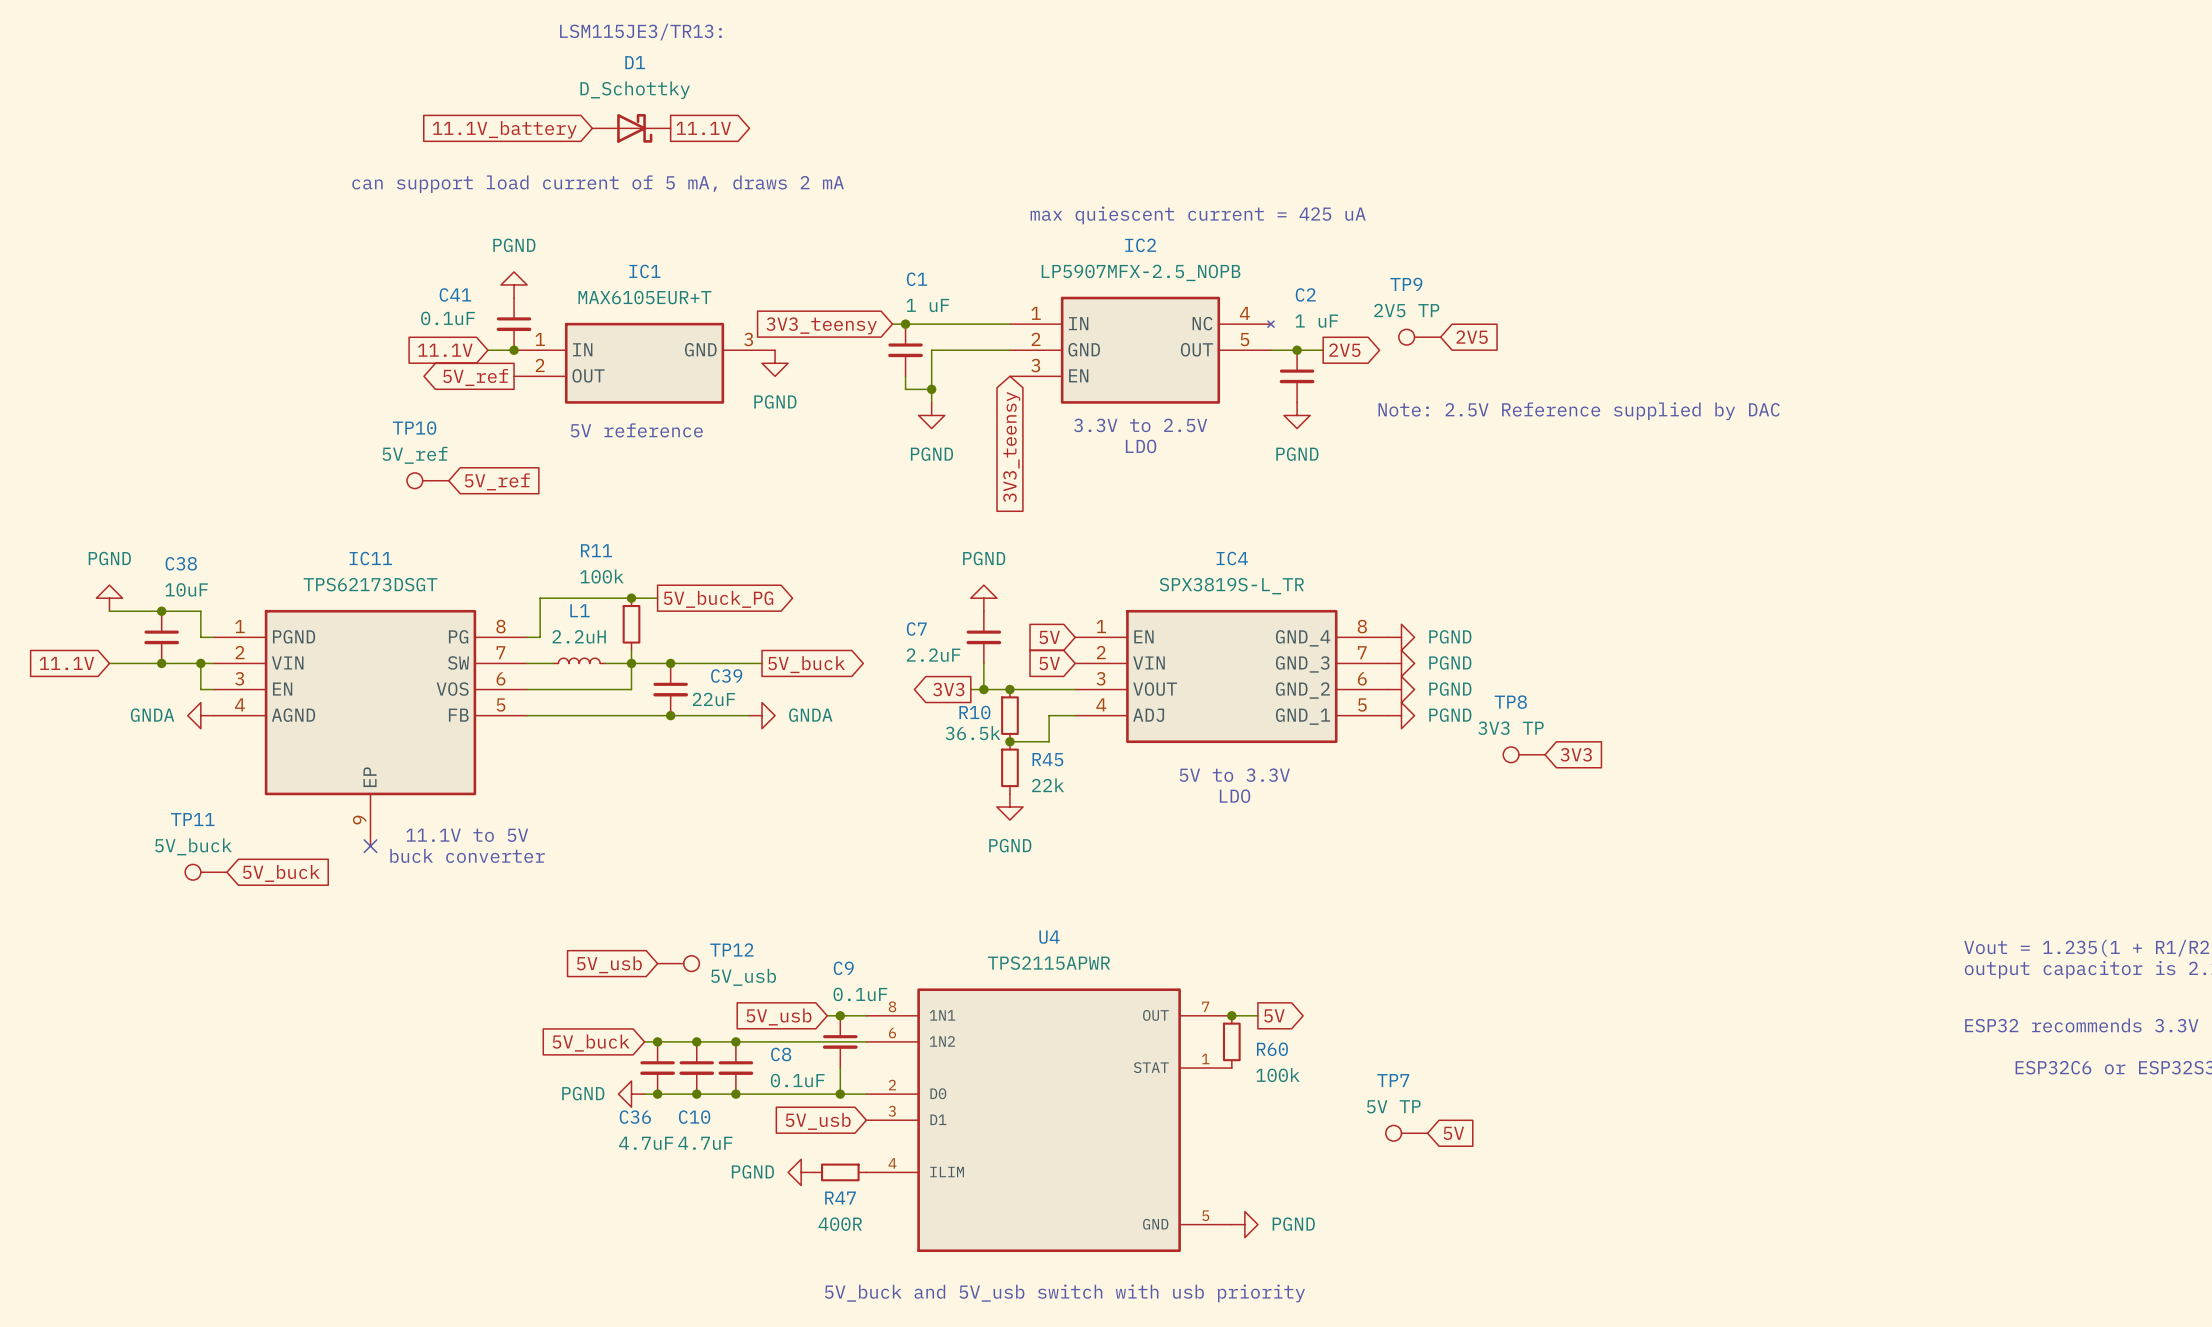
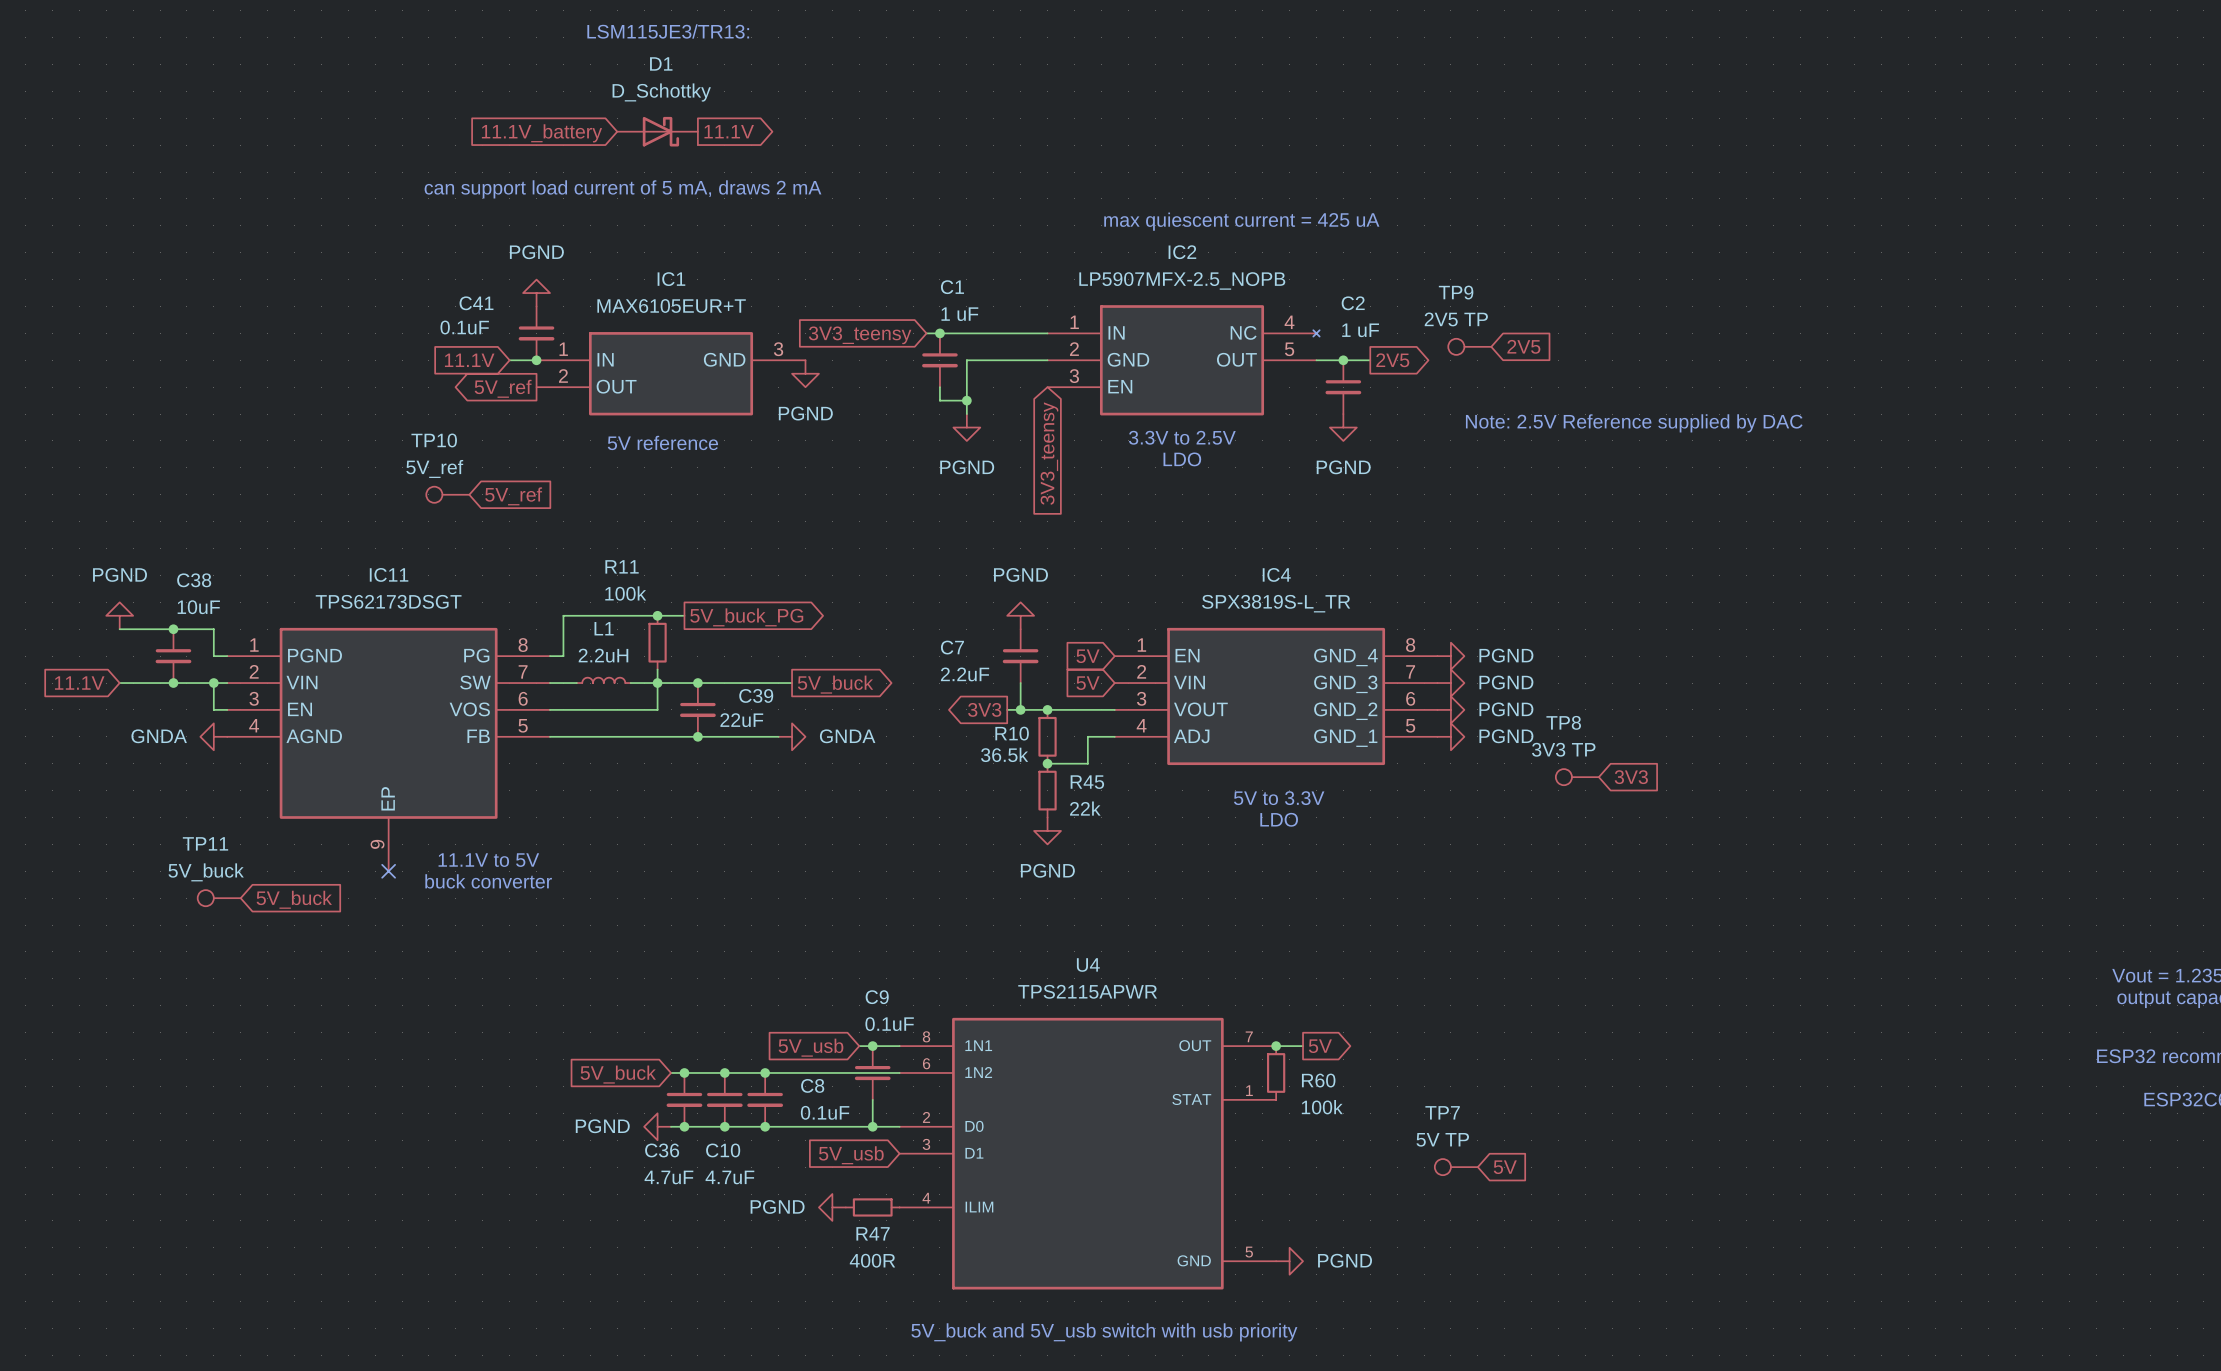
TP12: 5V_usb (678, 963) -> none
global label: 5V_usb (609, 964) -> none

